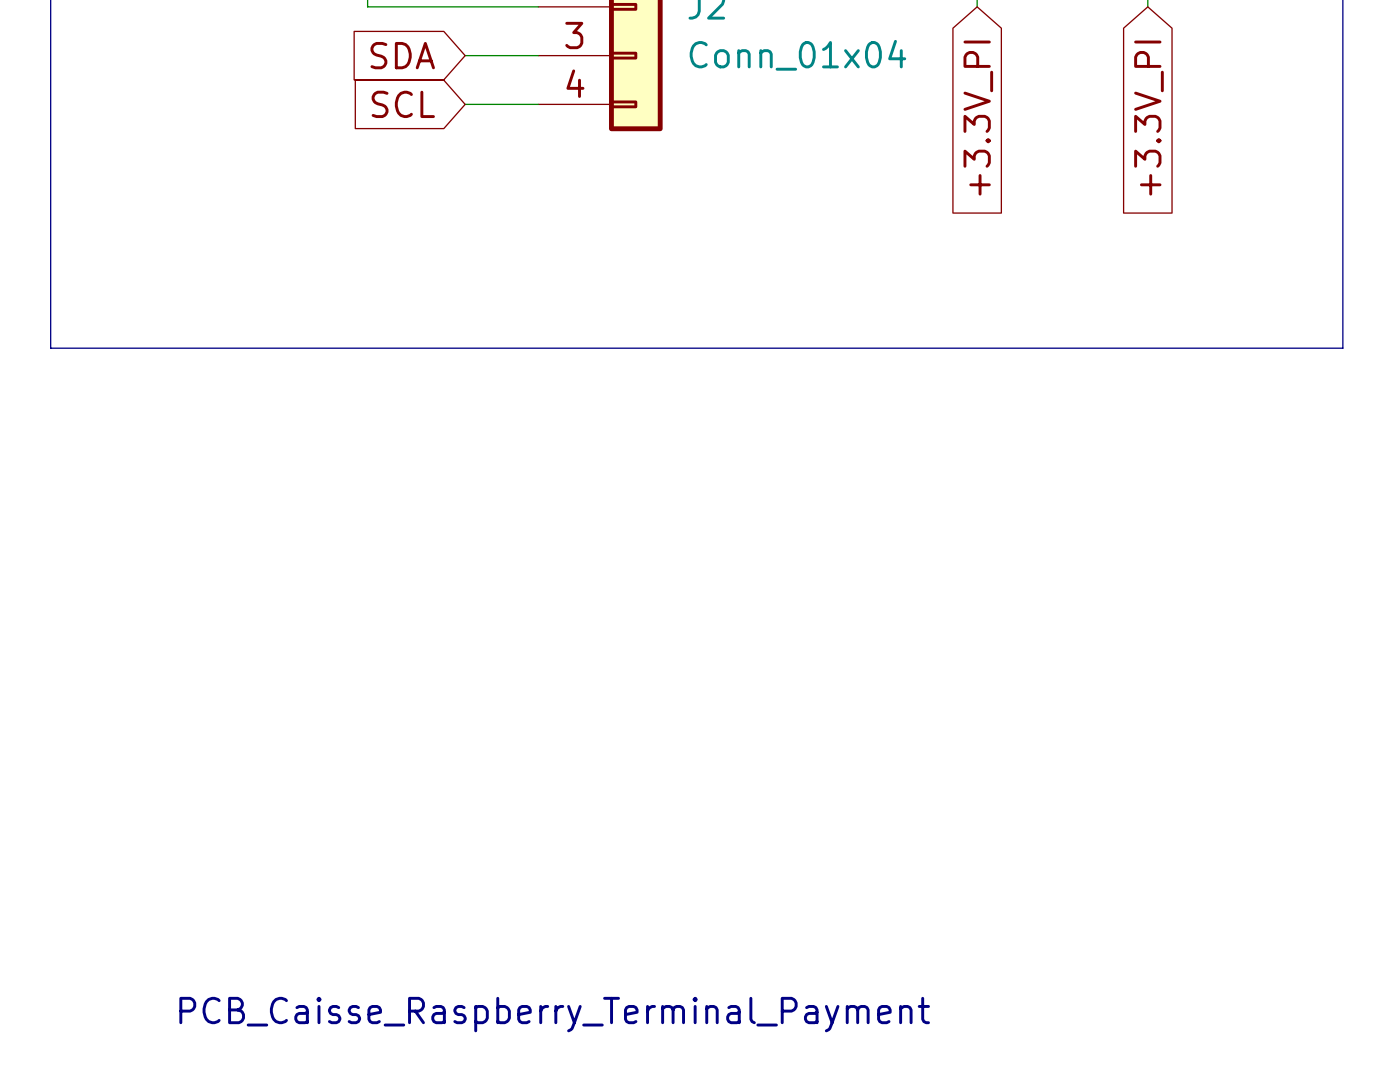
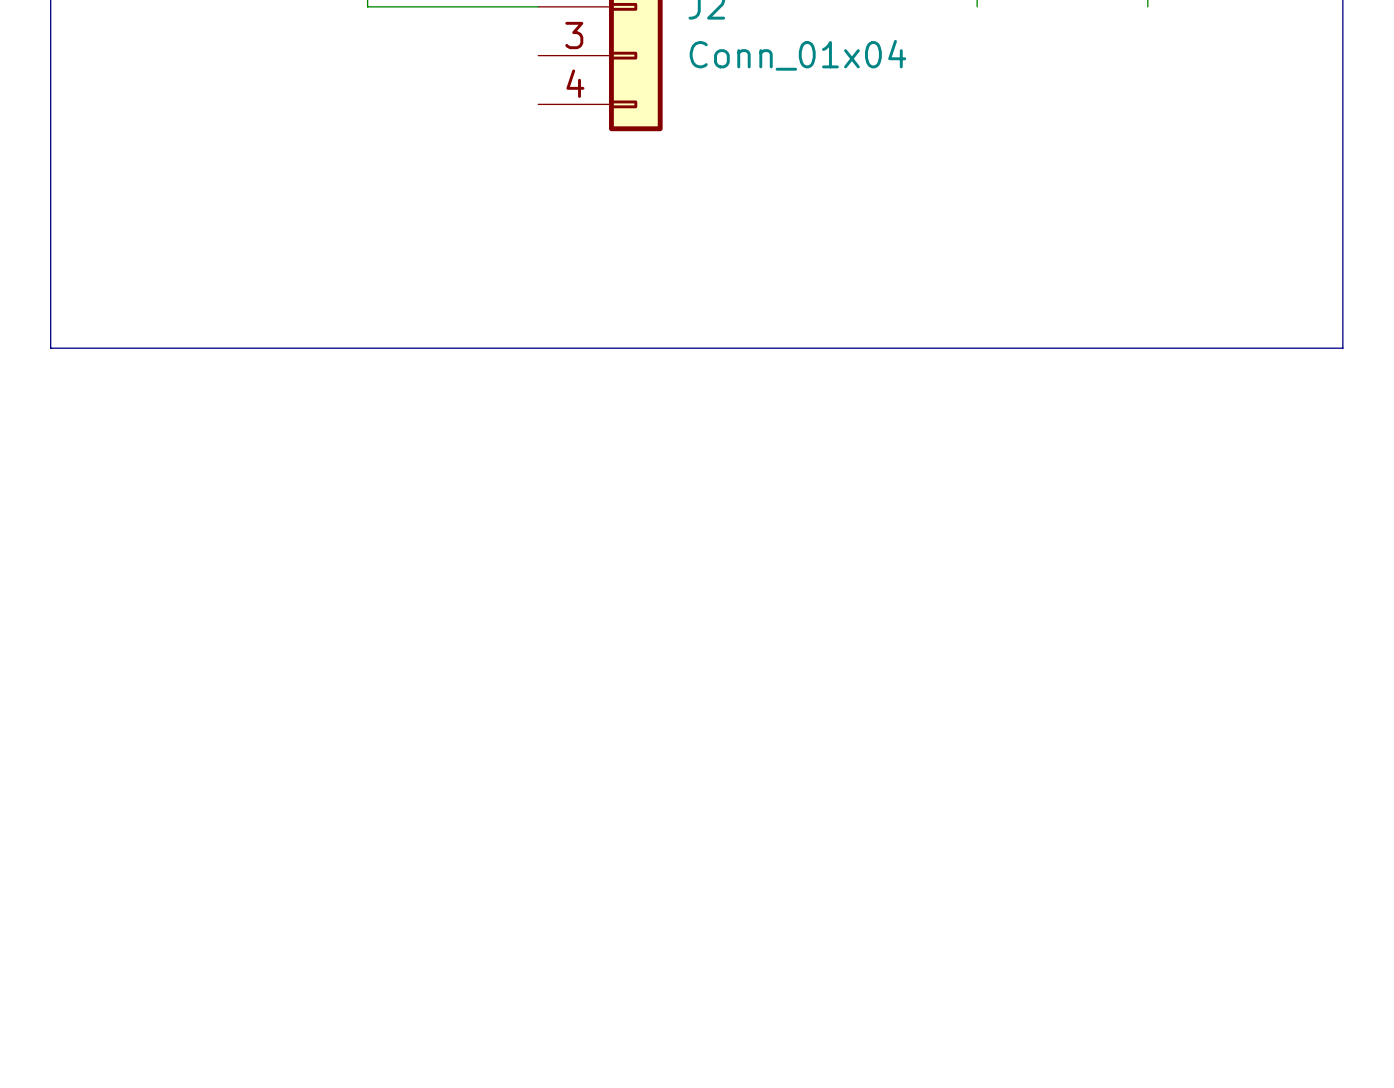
global label: SDA (402, 55) -> none
wire: (465, 55) (538, 55) -> none
global label: SCL (403, 104) -> none
wire: (465, 104) (538, 104) -> none
global label: +3.3V_PI (978, 118) -> none
global label: +3.3V_PI (1148, 118) -> none
text: PCB_Caisse_Raspberry_Terminal_Payment (554, 1014) -> none

